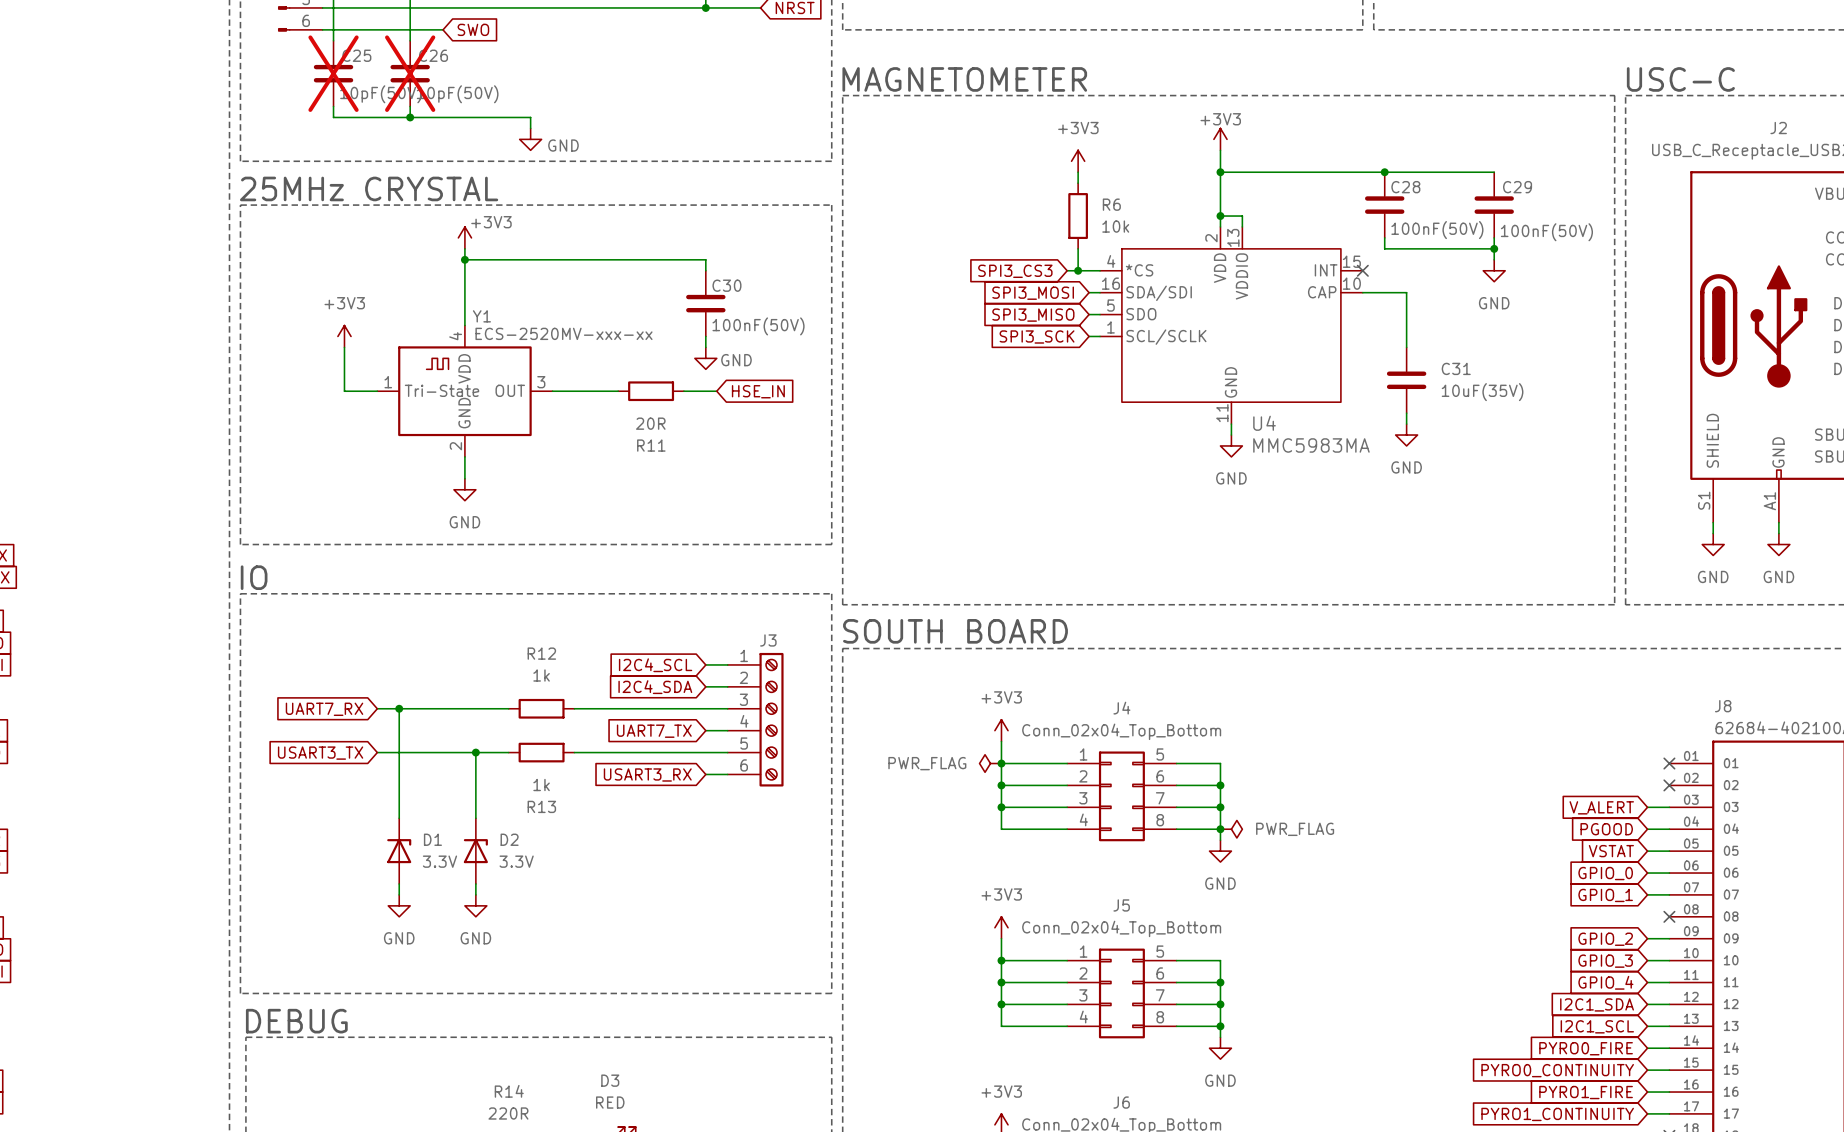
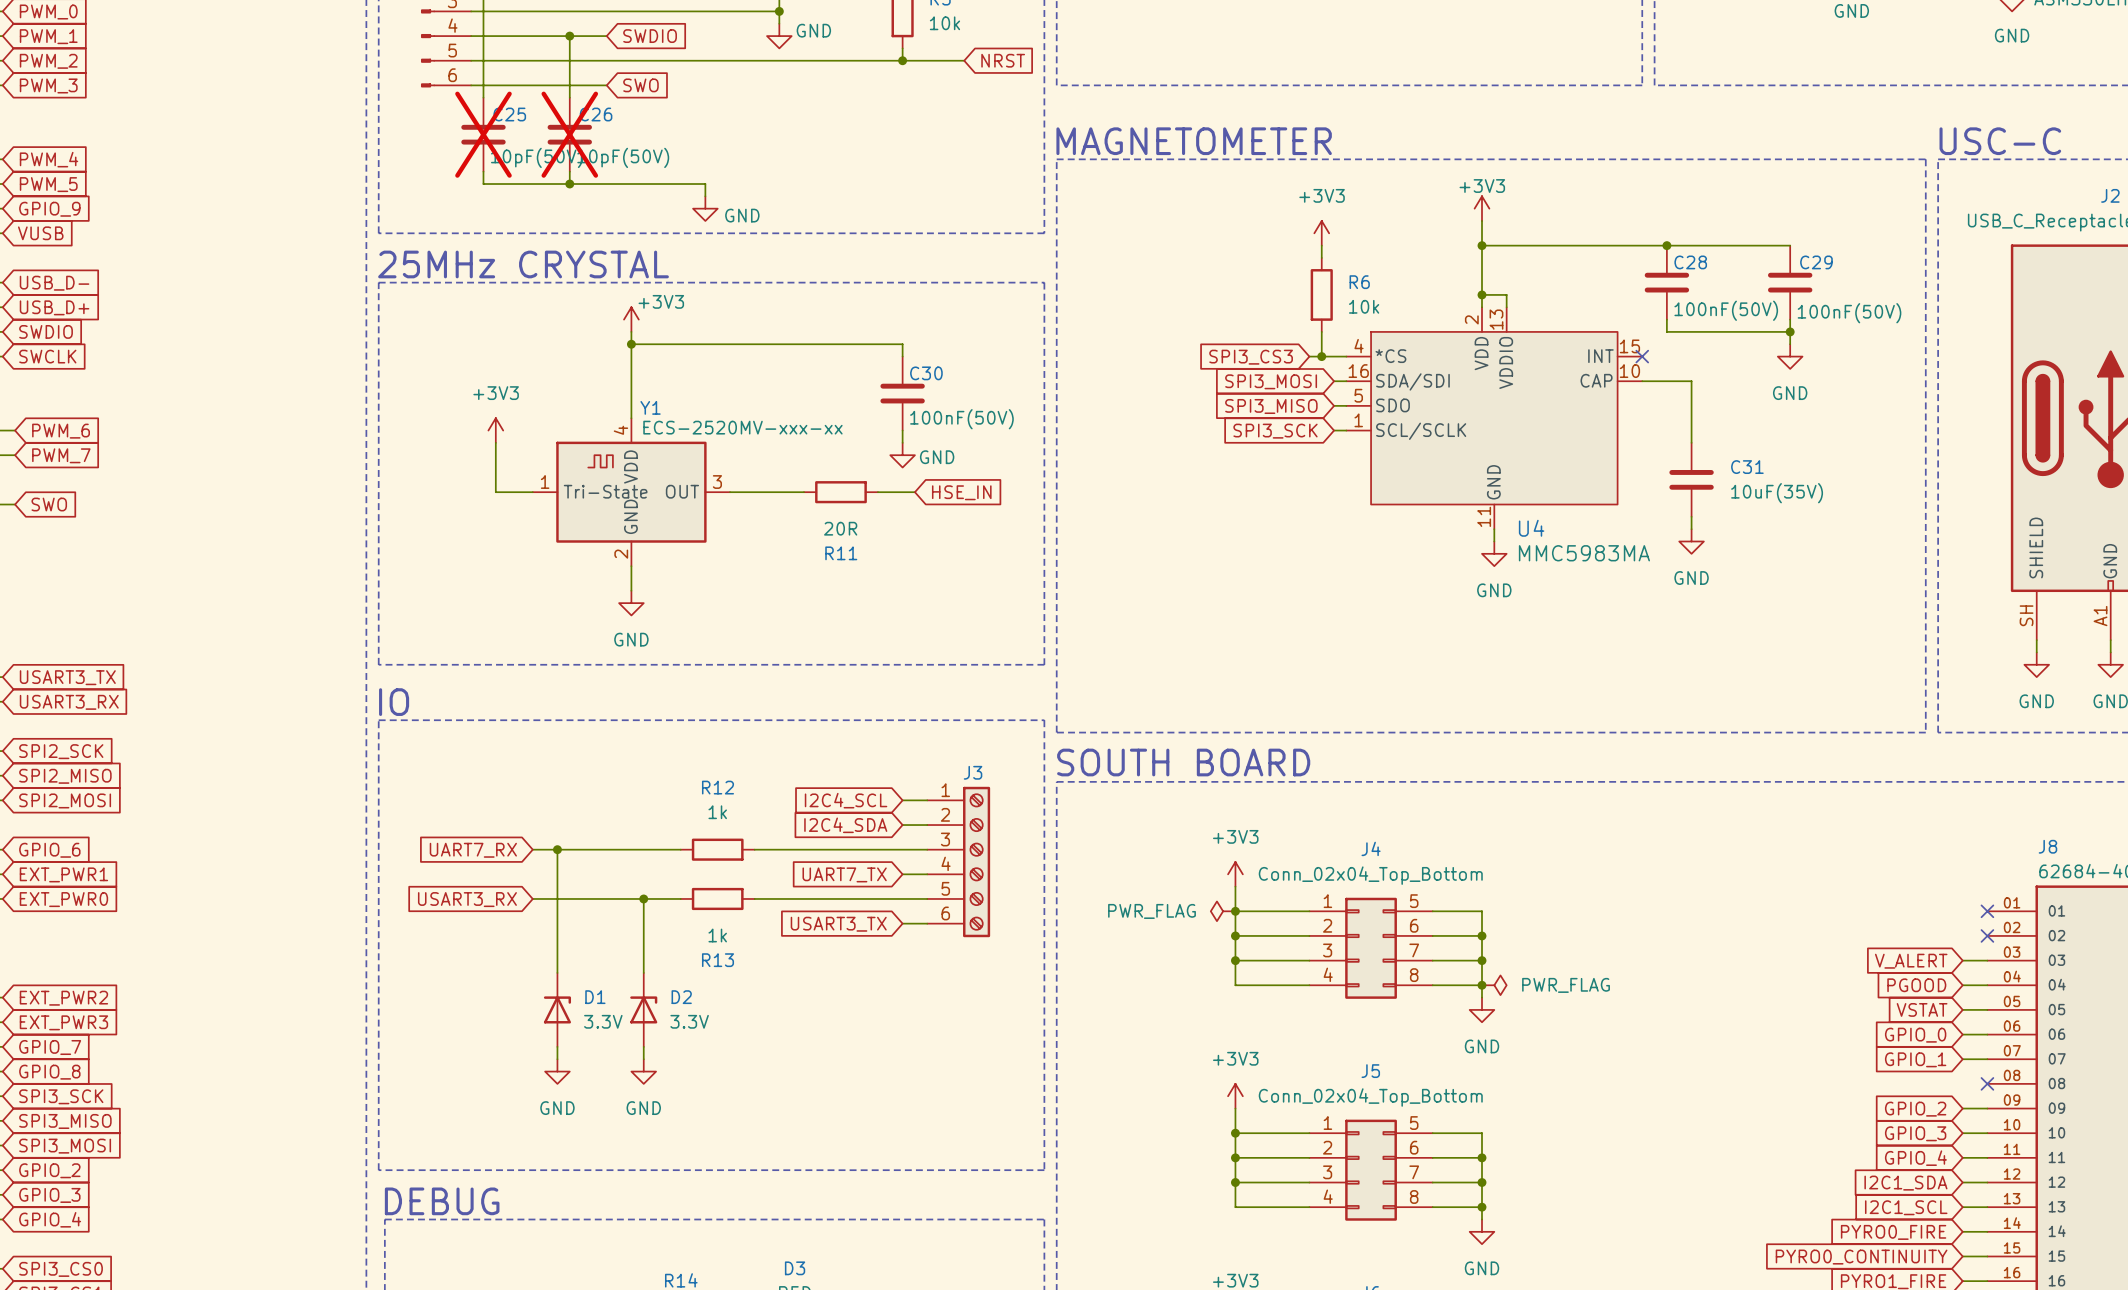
J2 pin number: S1 (1704, 500) -> SH (2026, 615)
global label: USART3_TX (320, 753) -> USART3_RX (467, 899)
global label: USART3_RX (647, 774) -> USART3_TX (838, 924)

